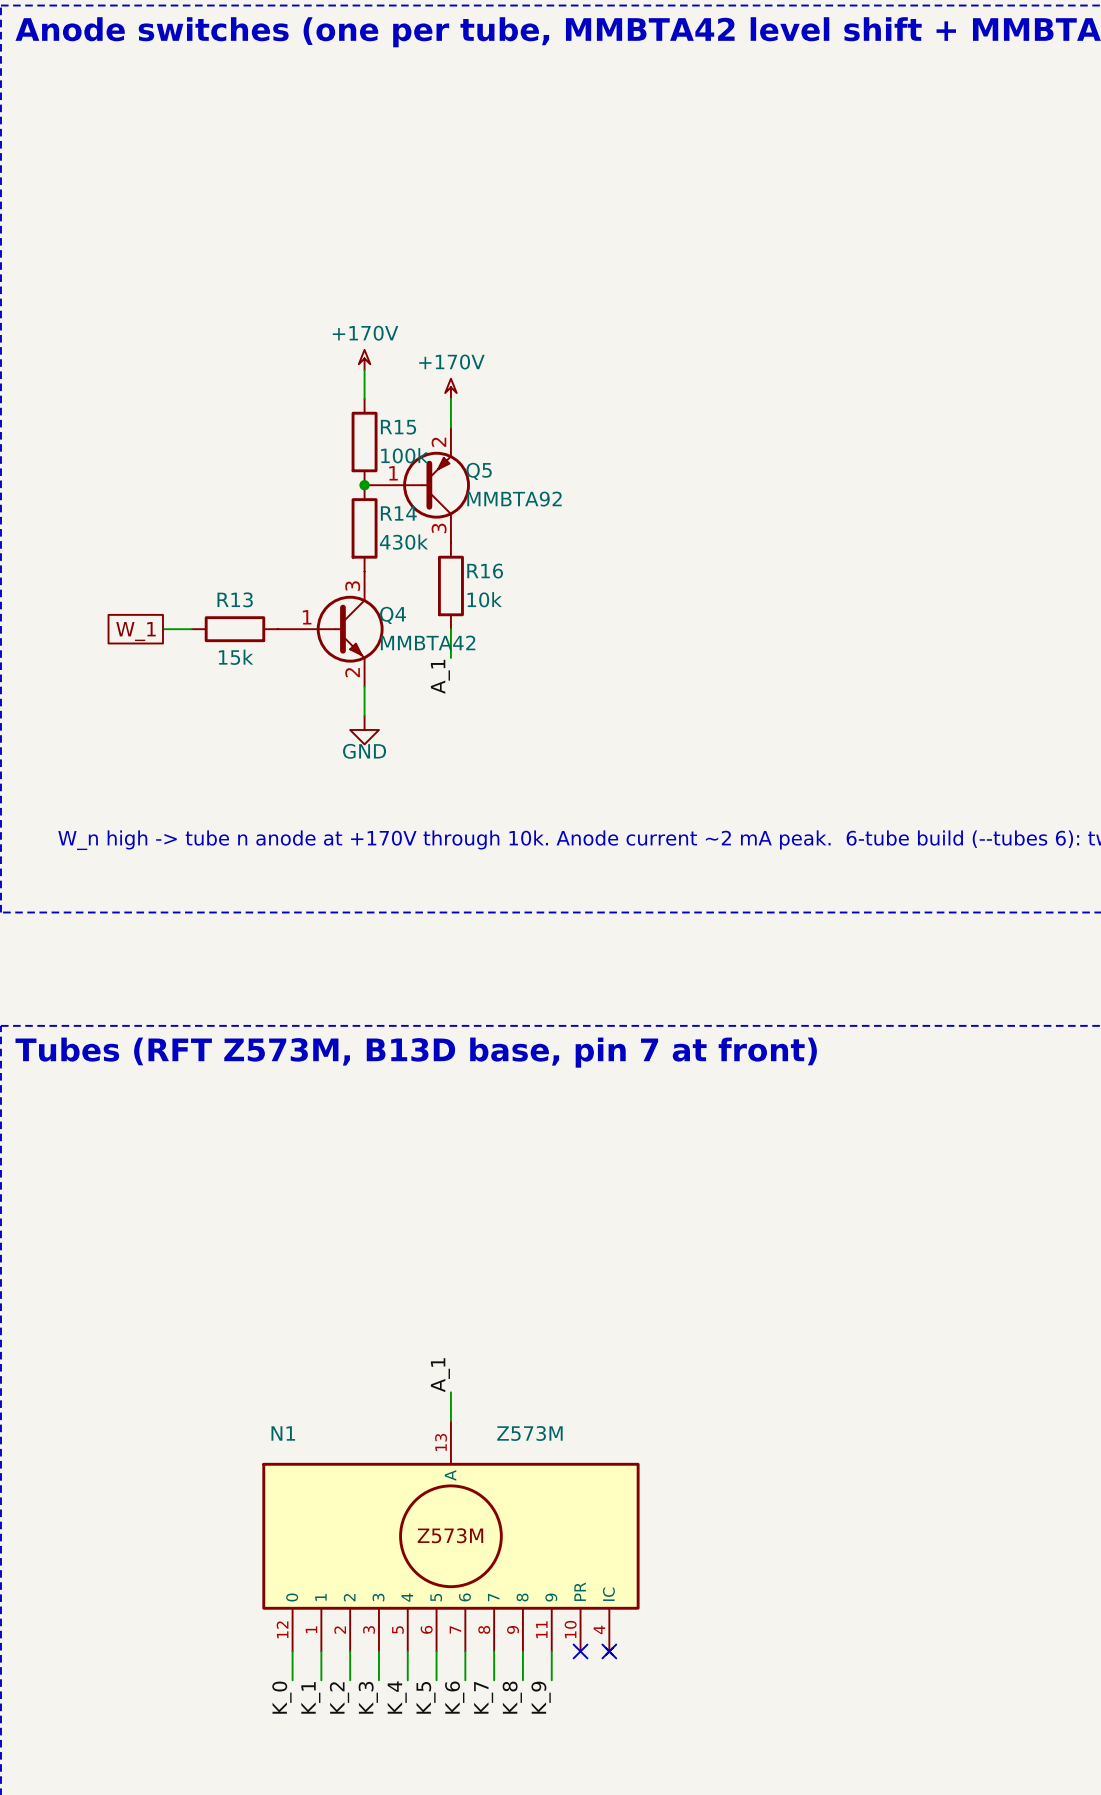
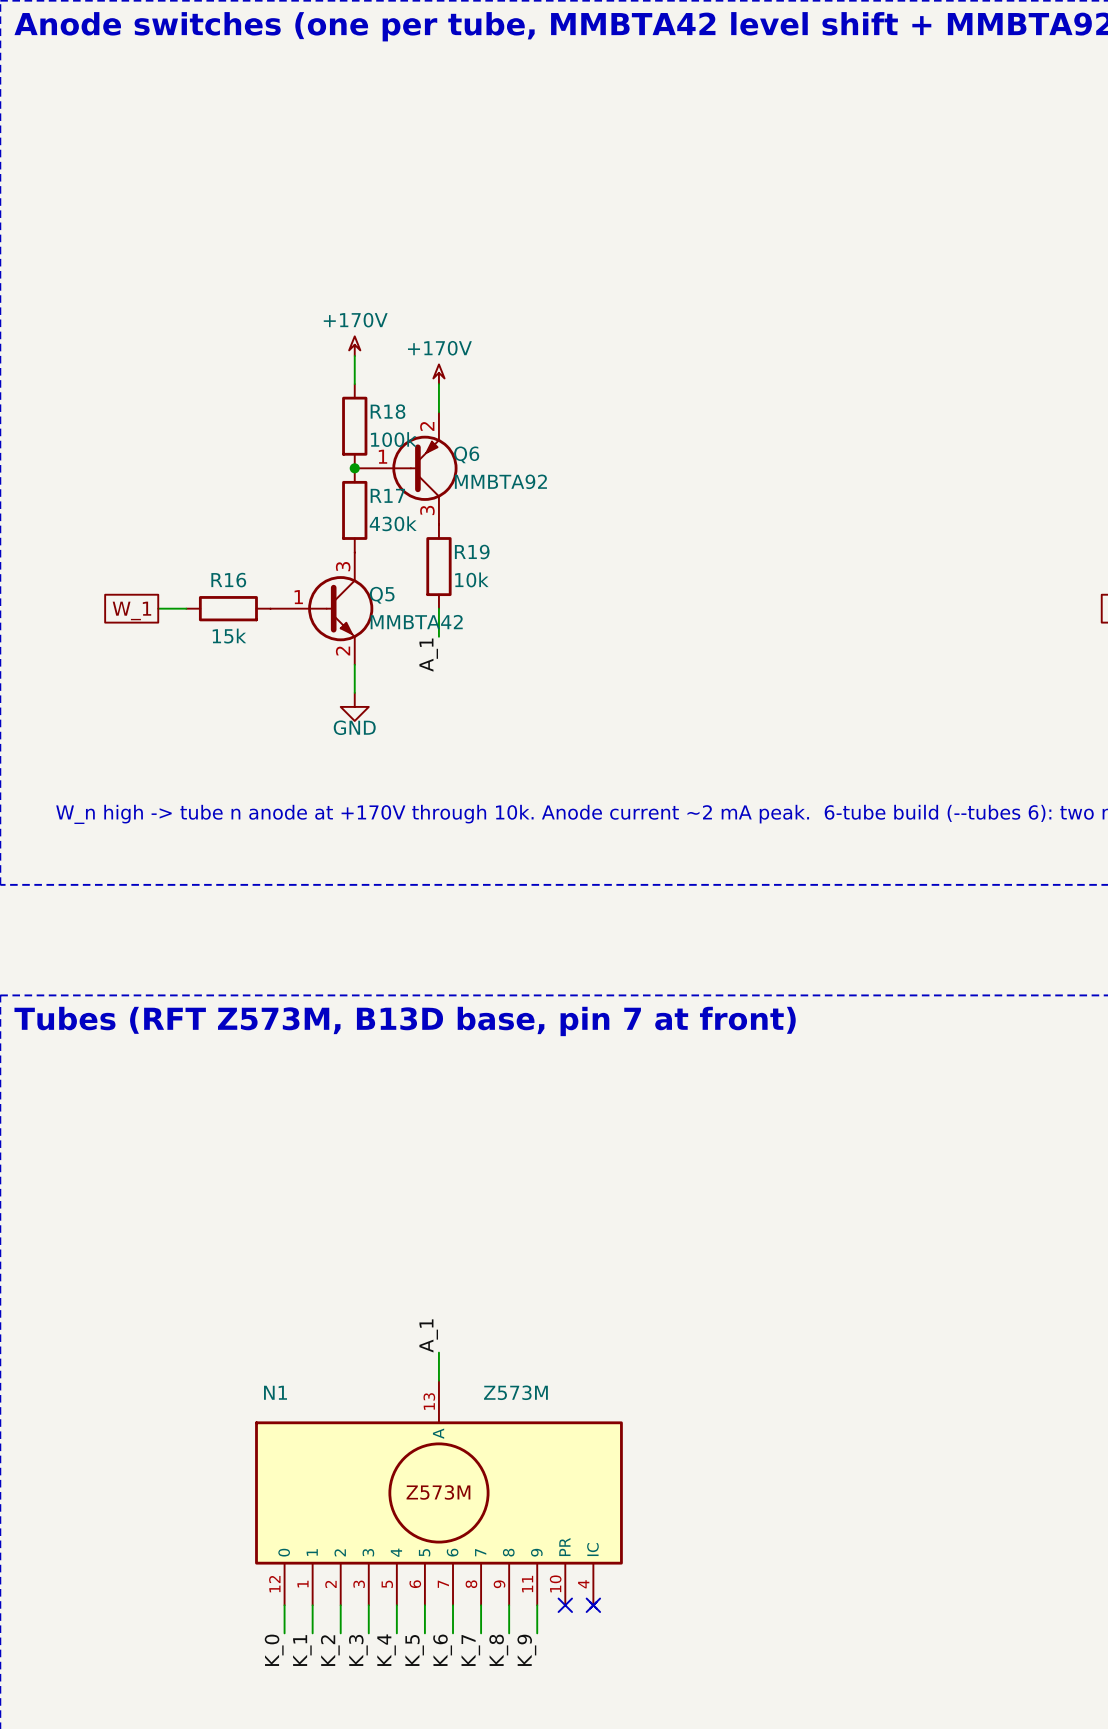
R15 name: R15 (398, 427) -> R18 (388, 411)
Q5 name: Q5 (479, 471) -> Q6 (466, 454)
R14 name: R14 (398, 513) -> R17 (387, 495)
R16 name: R16 (485, 571) -> R19 (472, 552)
R13 name: R13 (235, 599) -> R16 (228, 580)
Q4 name: Q4 (393, 615) -> Q5 (382, 595)

